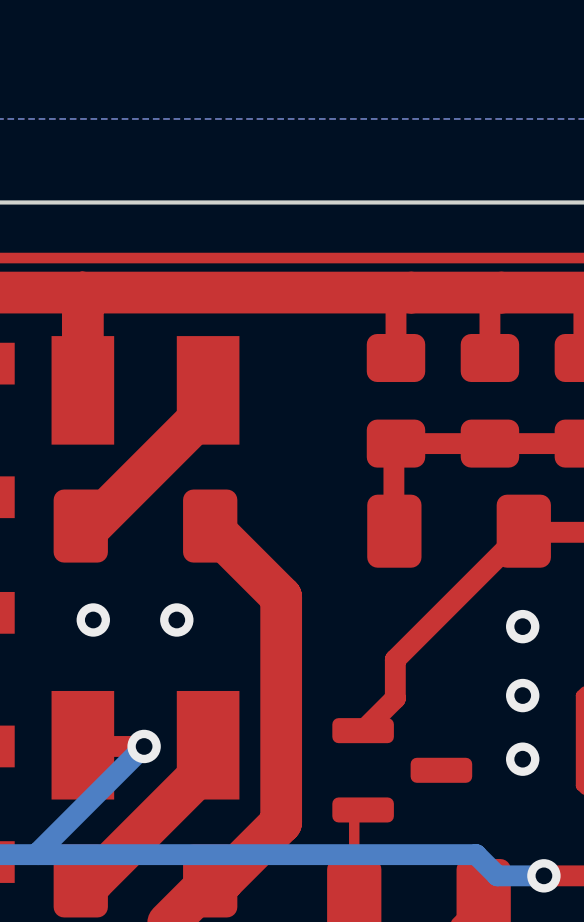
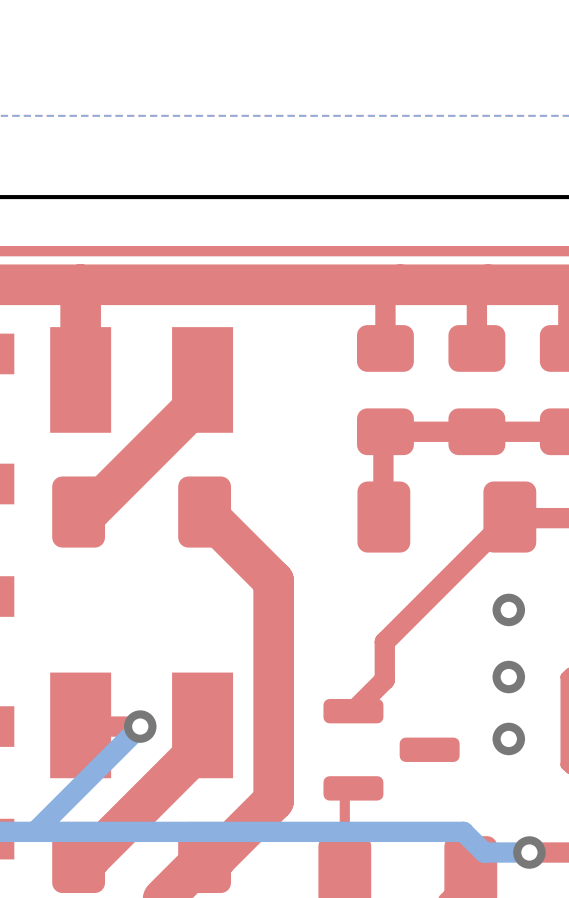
via: (93, 619) -> none
via: (176, 619) -> none

